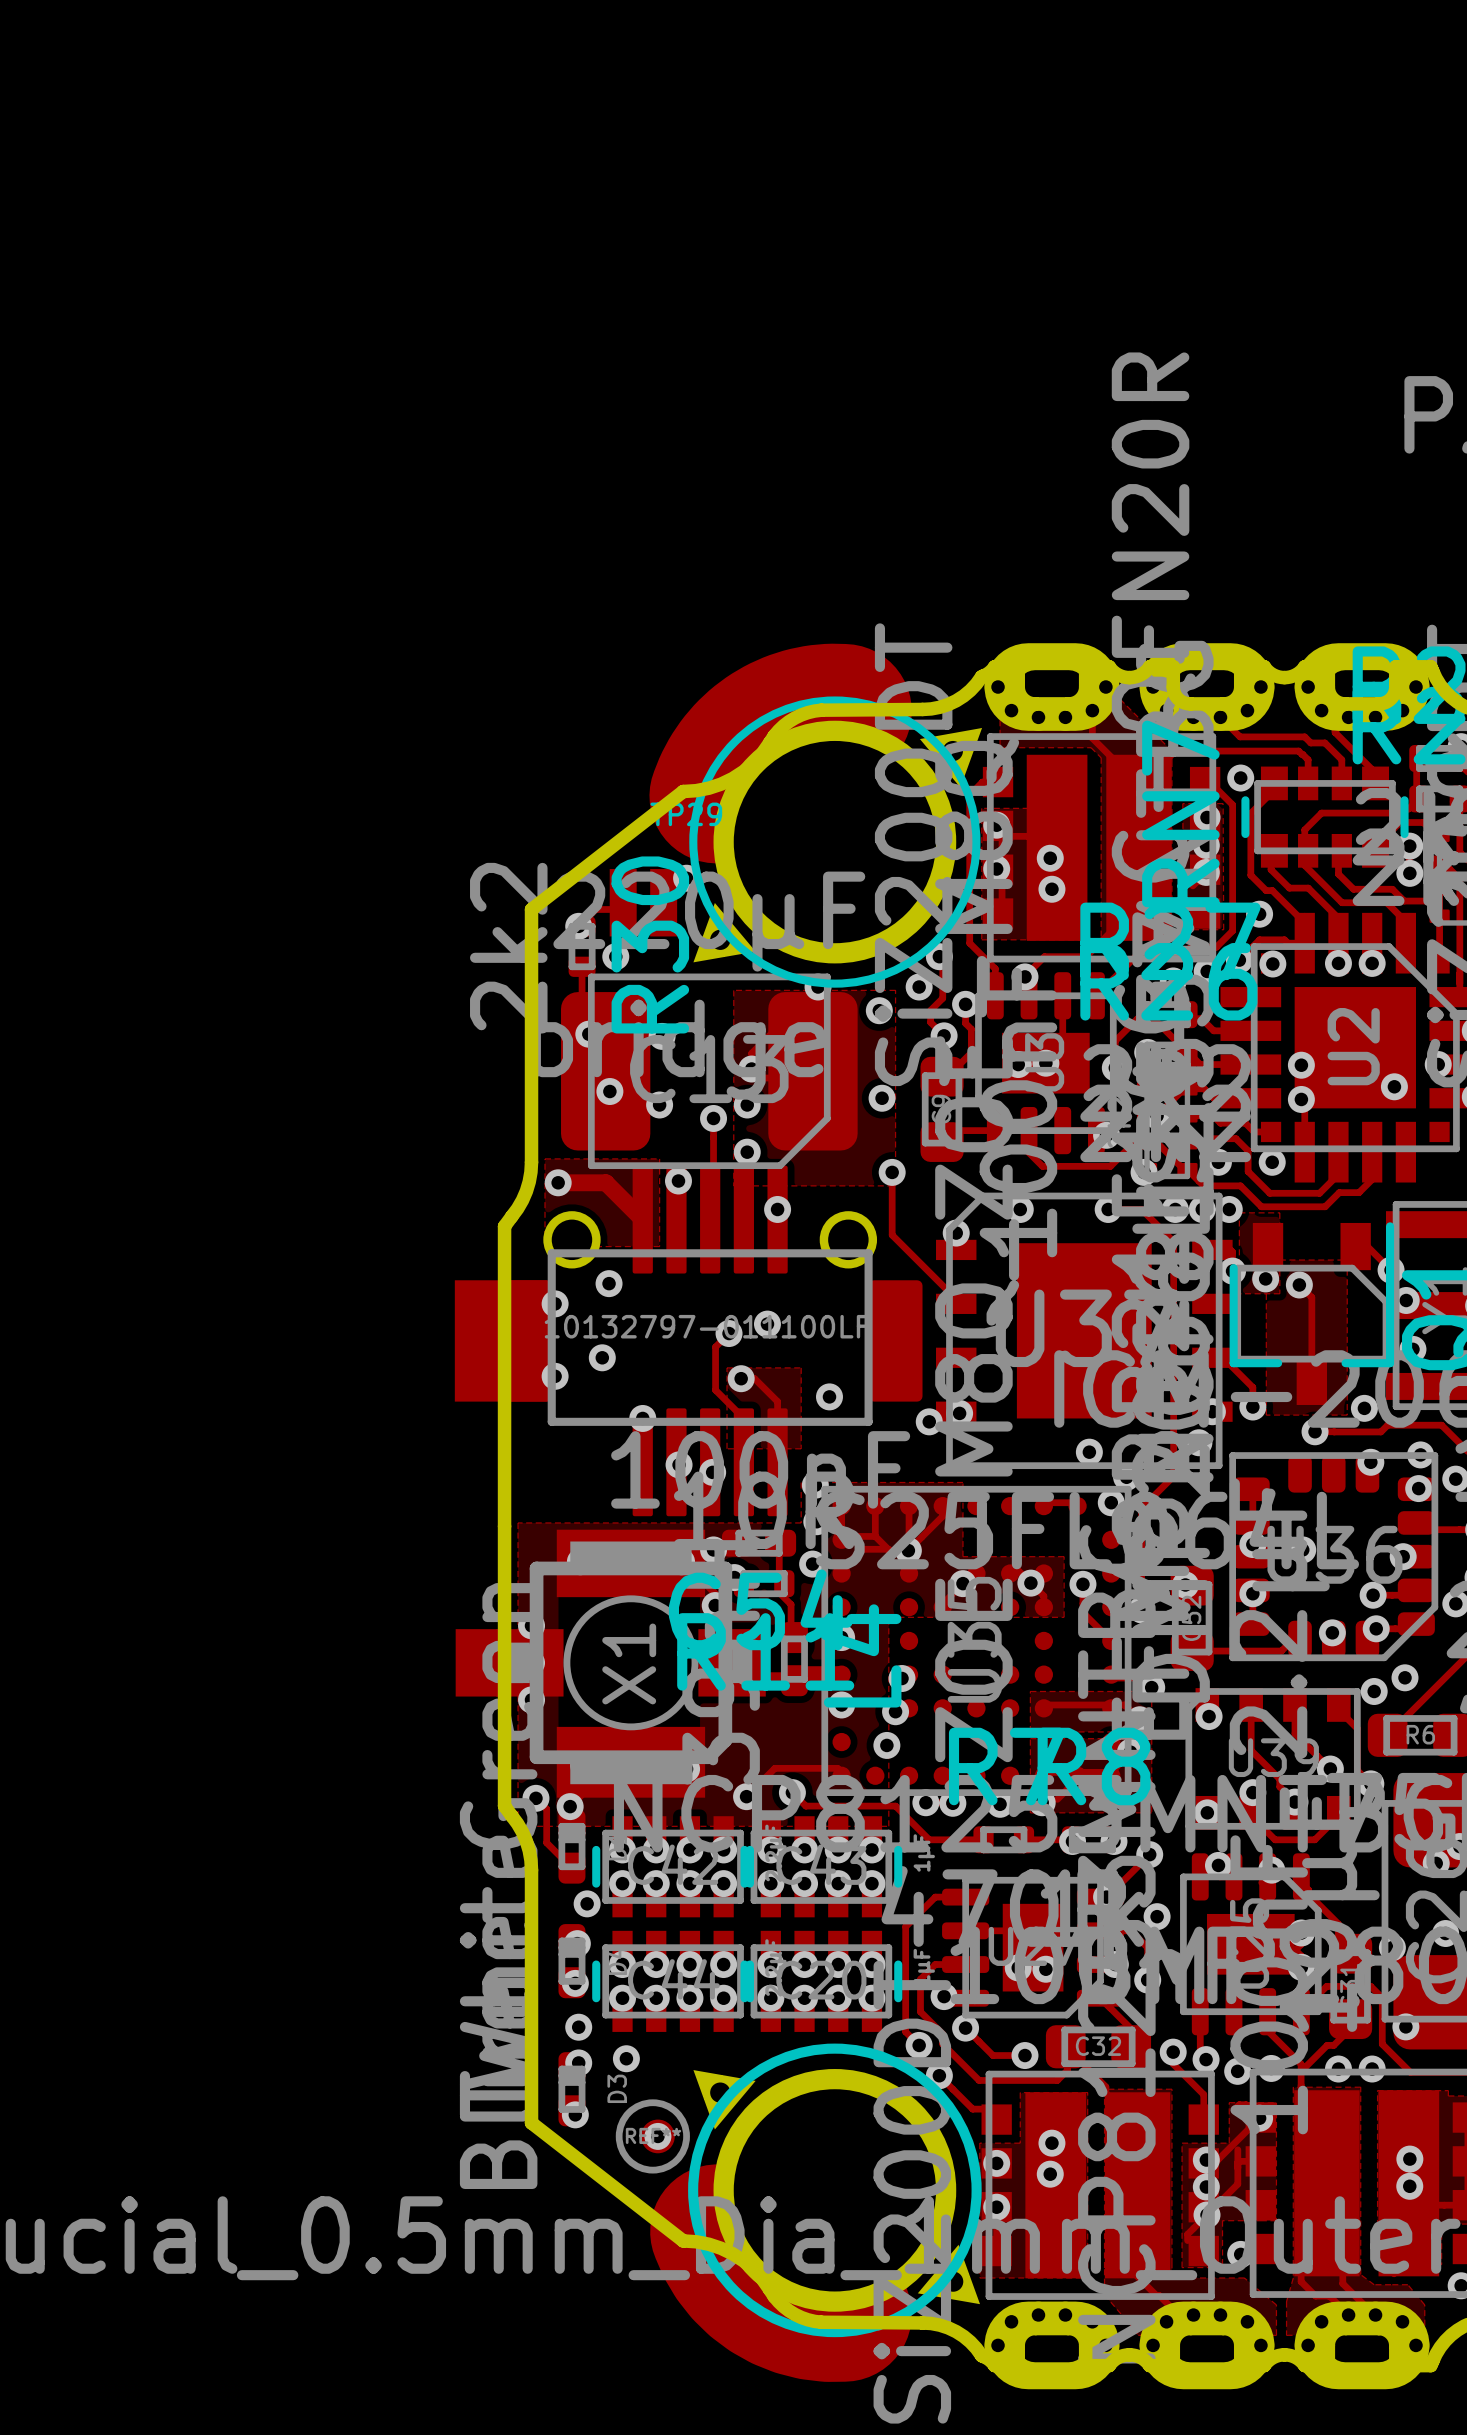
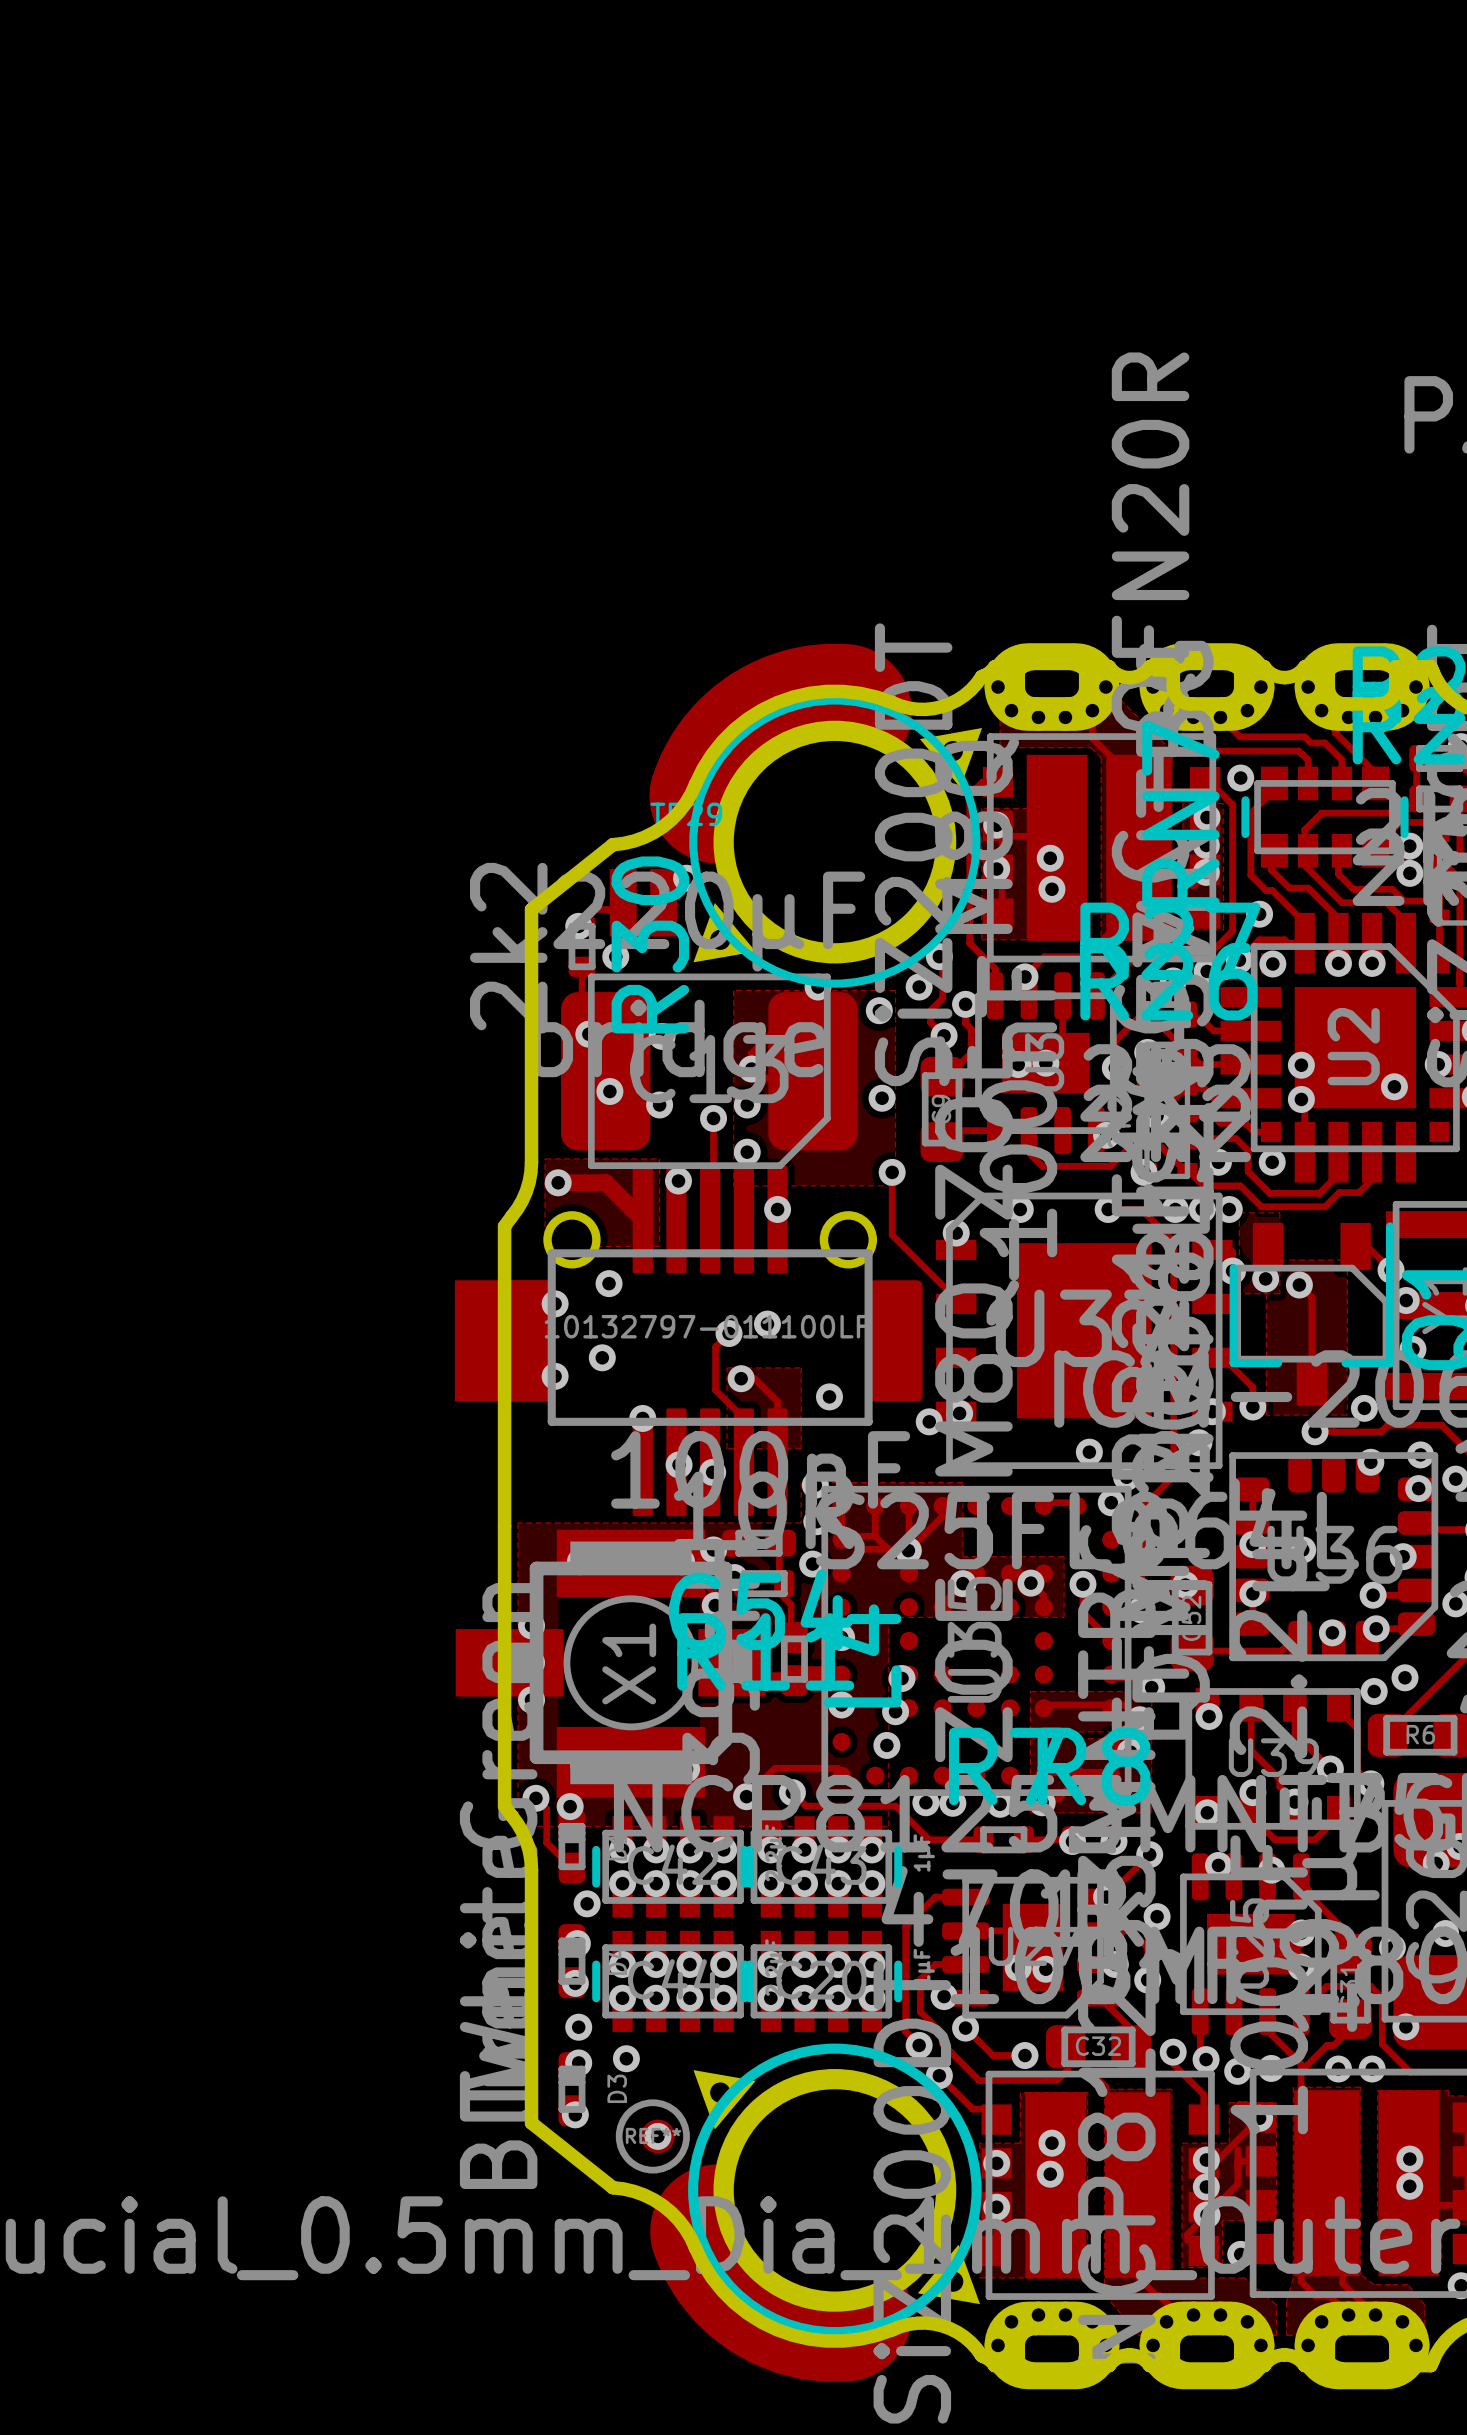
board edge: (981, 676) (963, 696) (939, 707) (922, 709) (821, 710) (795, 717) (778, 730) (762, 753) (743, 771) (721, 784) (696, 790) (683, 791) (531, 909) -> (981, 676) (964, 695) (949, 703) (933, 708) (908, 708) (860, 693) (826, 691) (793, 697) (761, 710) (747, 719) (722, 741) (702, 769) (685, 803) (671, 819) (644, 837) (612, 844) (531, 909)
board edge: (531, 2122) (683, 2240) (708, 2244) (721, 2248) (743, 2260) (762, 2278) (778, 2301) (795, 2314) (821, 2322) (922, 2322) (939, 2325) (963, 2336) (981, 2355) -> (531, 2122) (612, 2187) (644, 2195) (671, 2212) (685, 2228) (702, 2263) (722, 2290) (747, 2313) (761, 2322) (793, 2335) (826, 2340) (860, 2339) (908, 2324) (933, 2323) (949, 2328) (964, 2337) (981, 2355)

